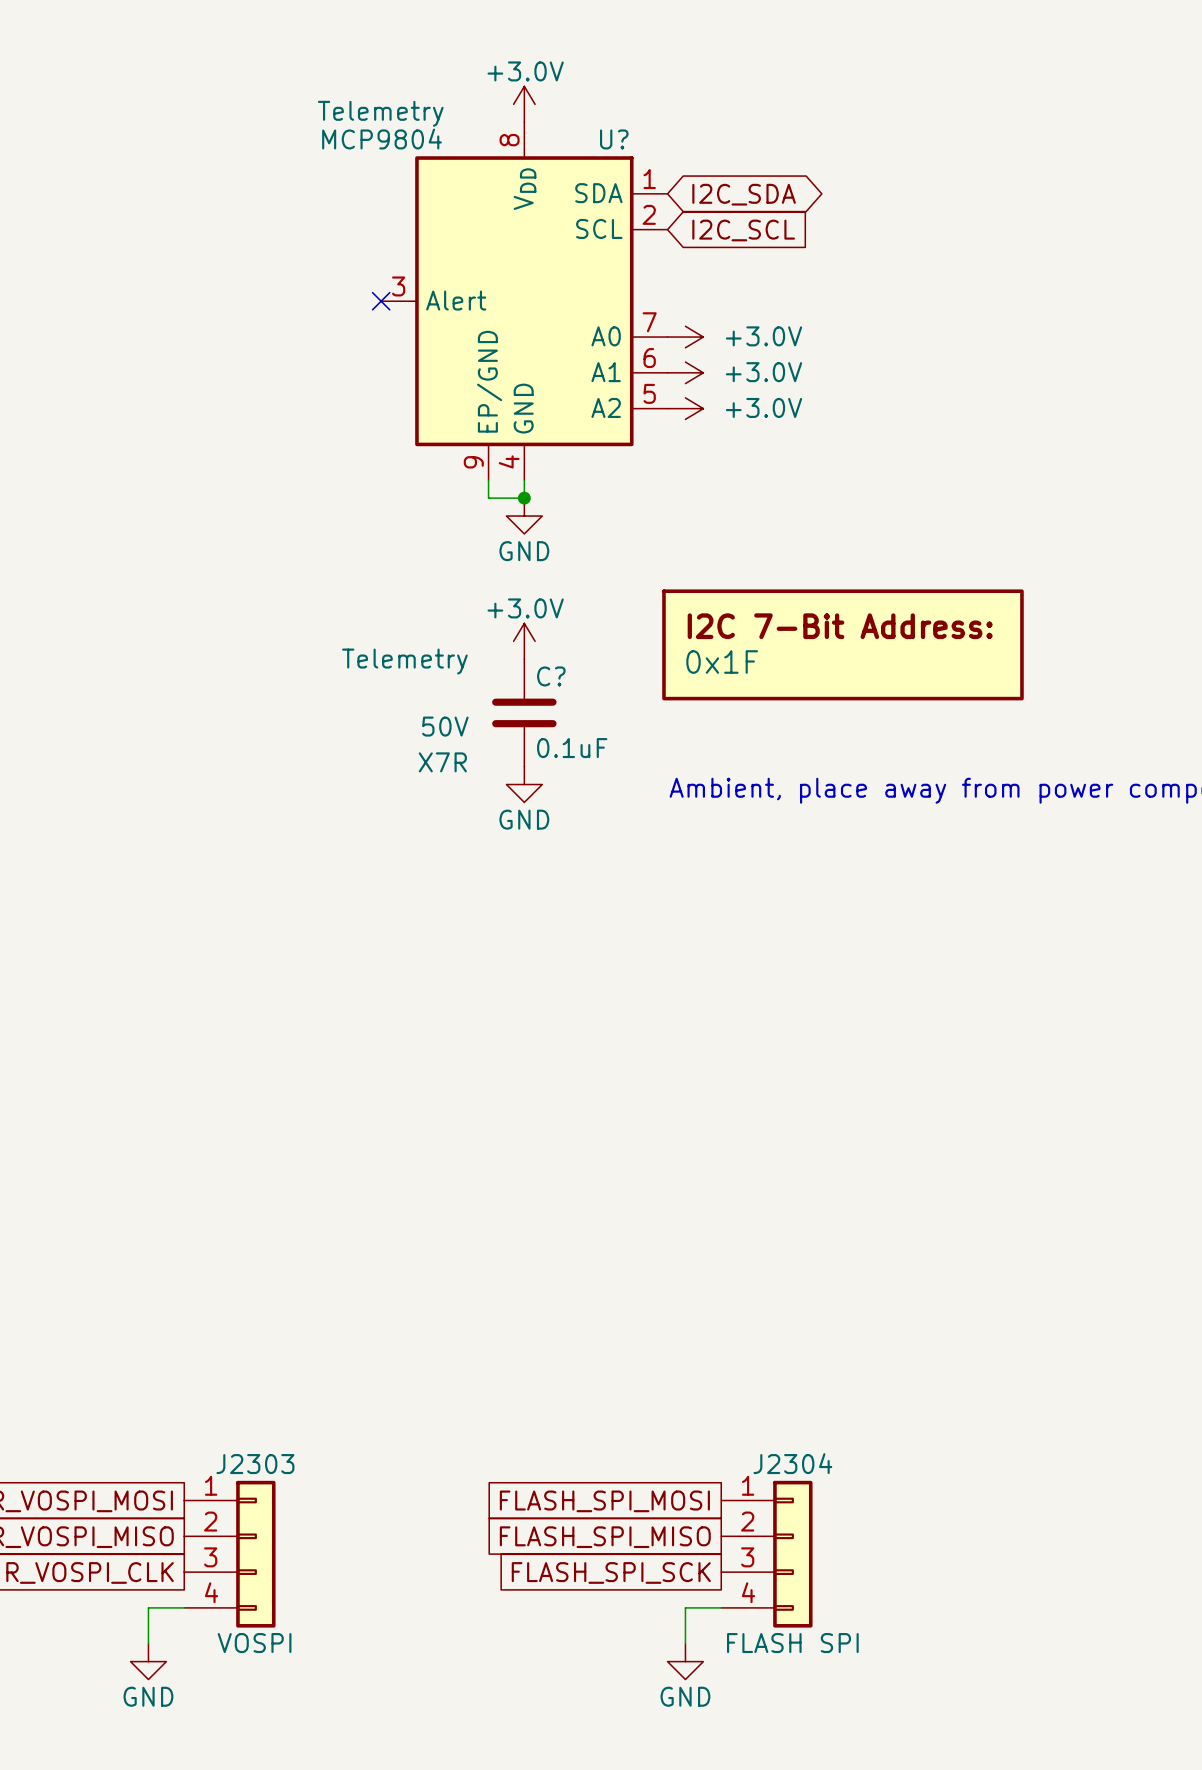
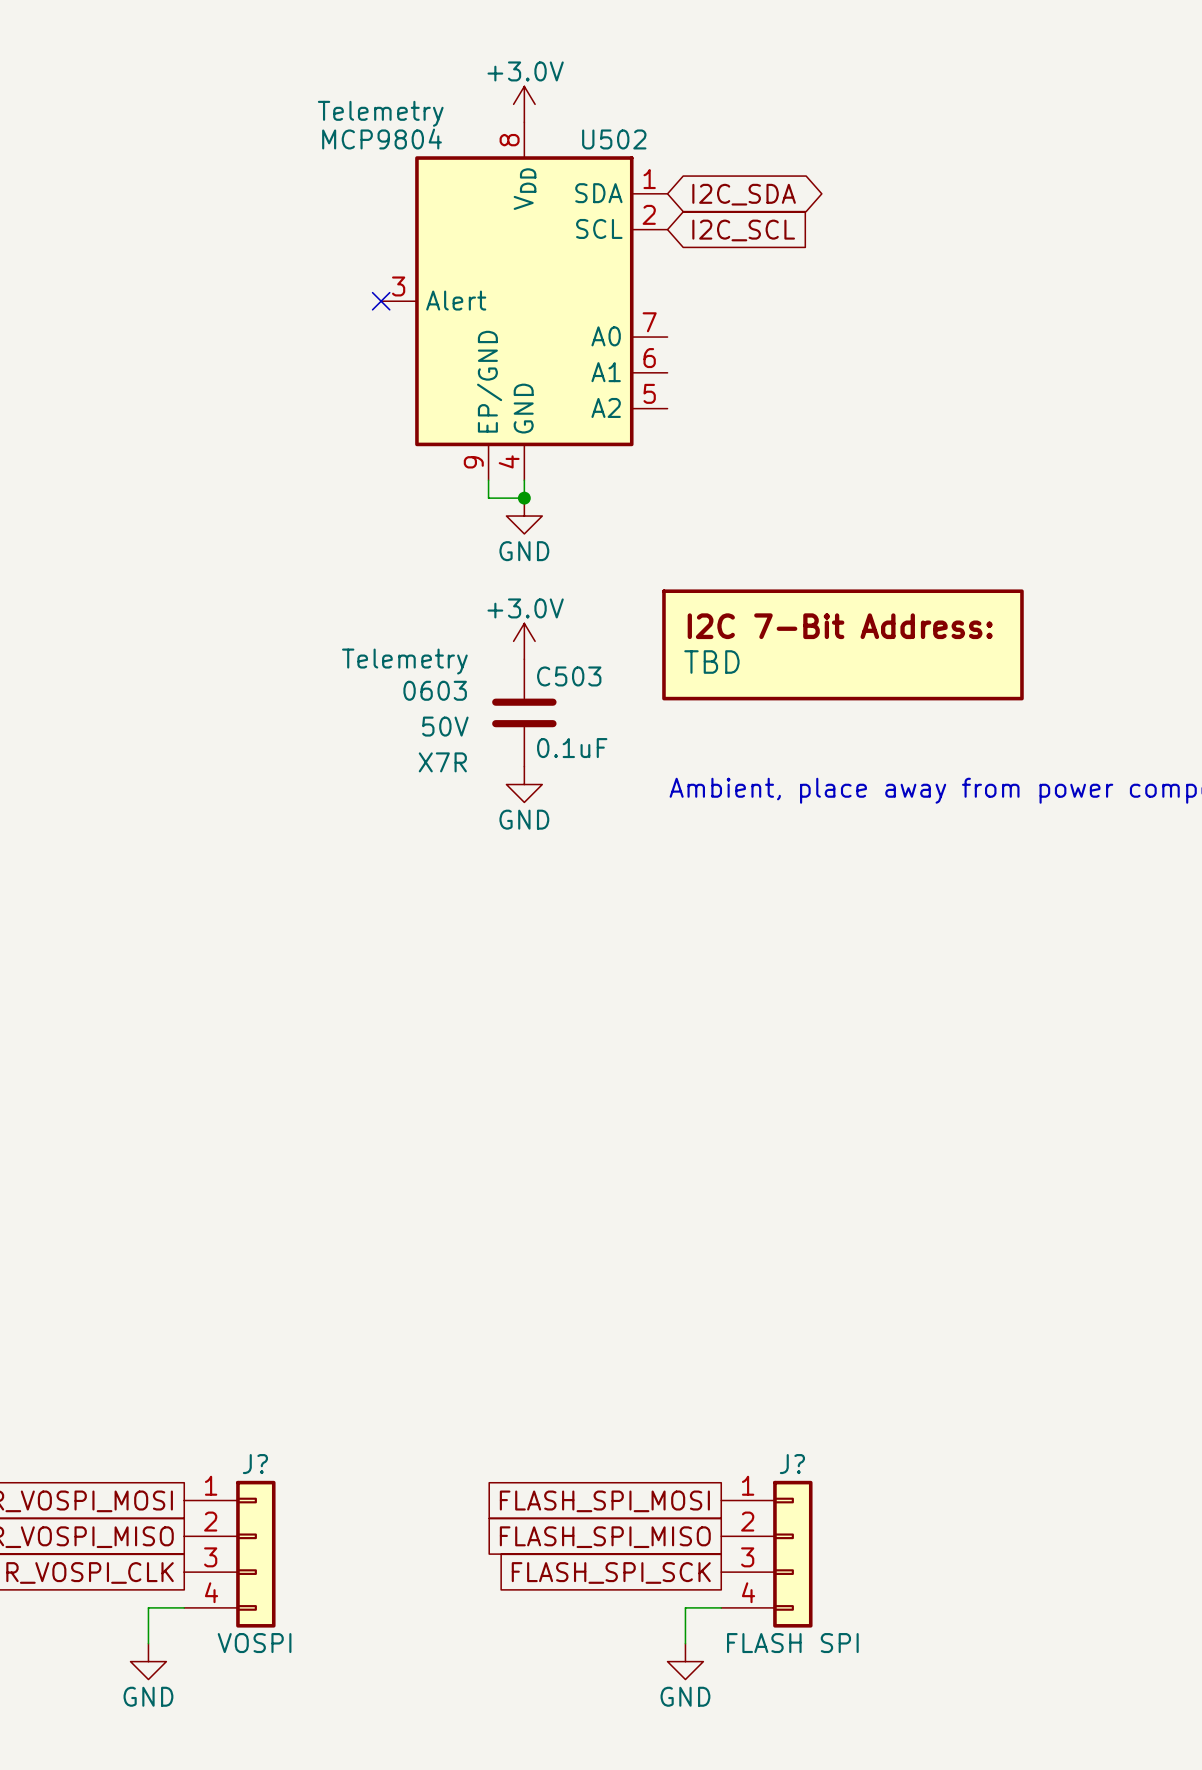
U? name: U? (614, 139) -> U502 (614, 139)
power symbol: +3.0V (685, 337) -> none
power symbol: +3.0V (685, 372) -> none
power symbol: +3.0V (685, 408) -> none
part value: 0x1F (722, 662) -> TBD (711, 662)
C? name: C? (551, 676) -> C503 (569, 676)
C? text: none -> 0603 (435, 690)
J2304 name: J2304 (792, 1463) -> J? (792, 1464)
J2303 name: J2303 (255, 1464) -> J? (255, 1464)

